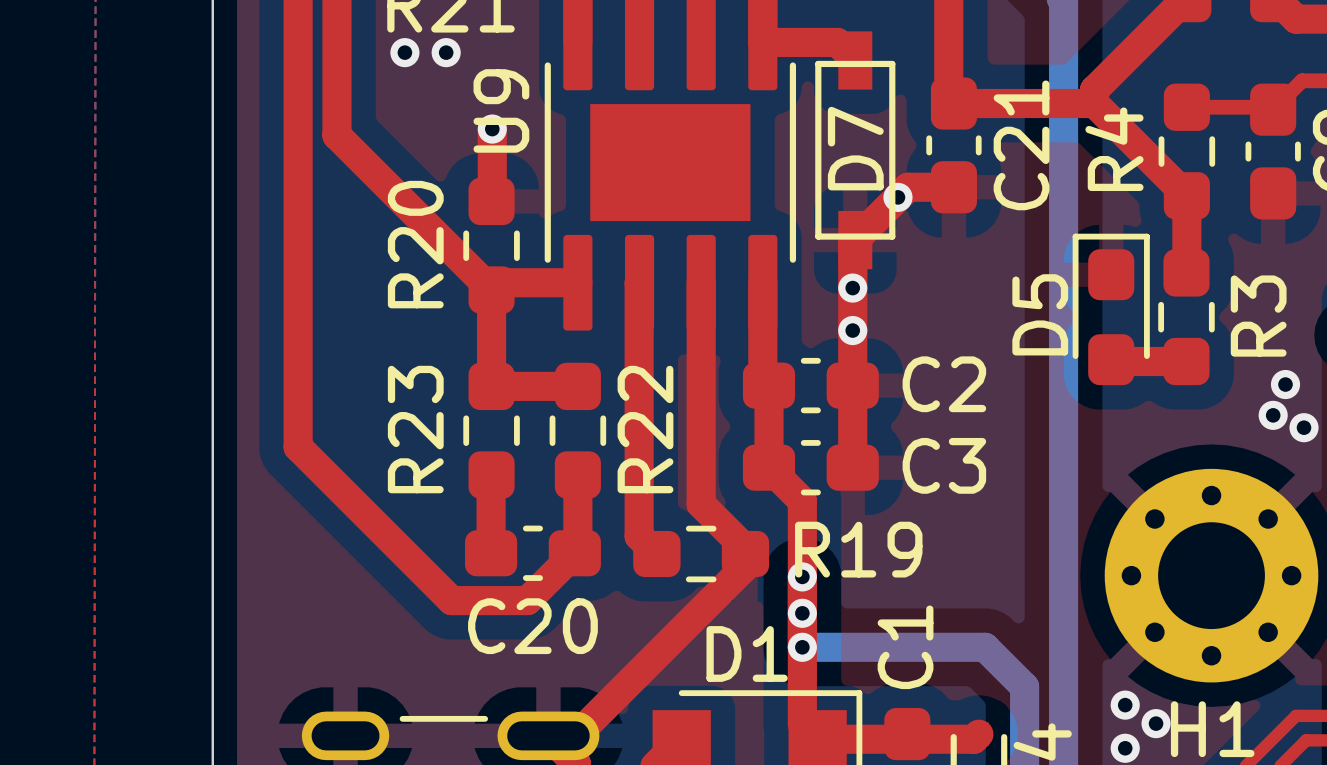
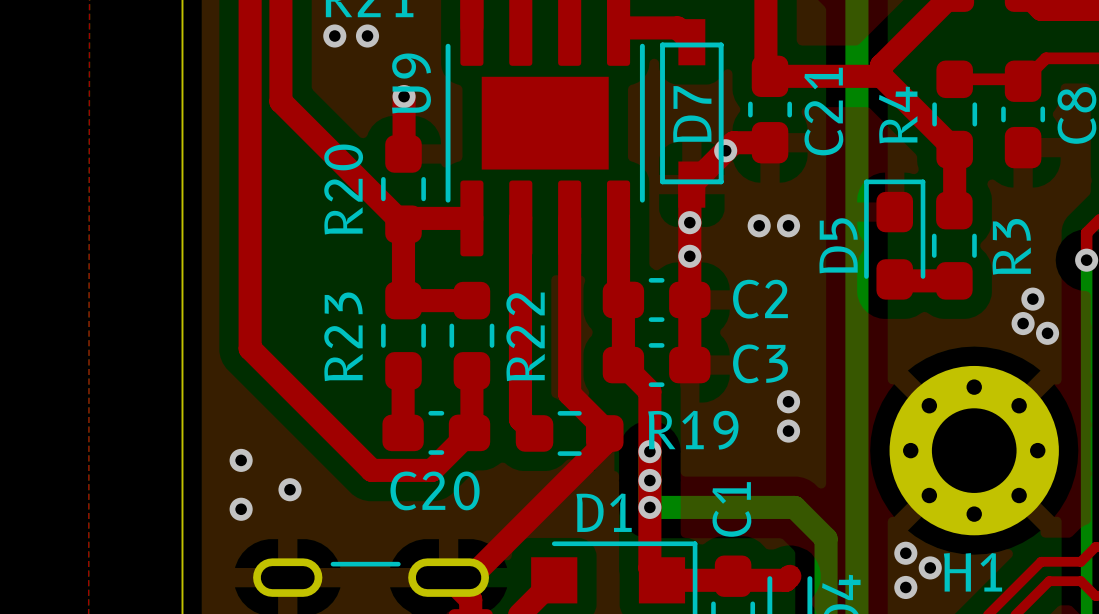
via: none -> (759, 225)
via: none -> (788, 225)
via: none -> (788, 401)
via: none -> (788, 431)
via: none -> (241, 460)
via: none -> (290, 489)
via: none -> (241, 509)

